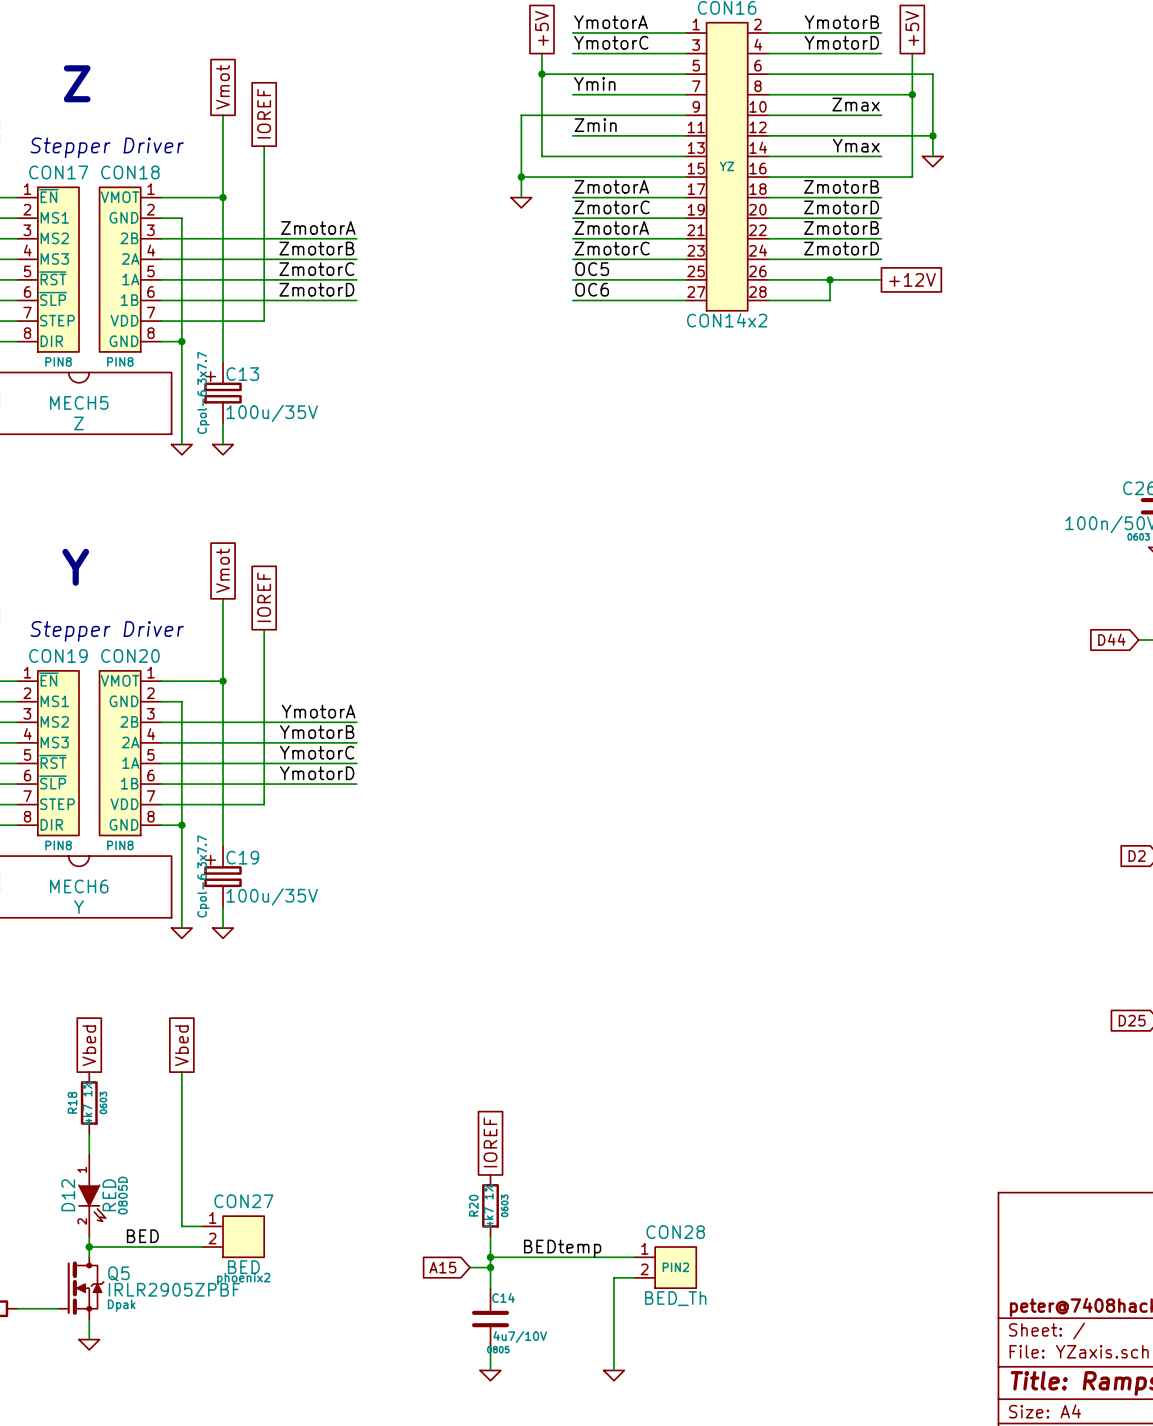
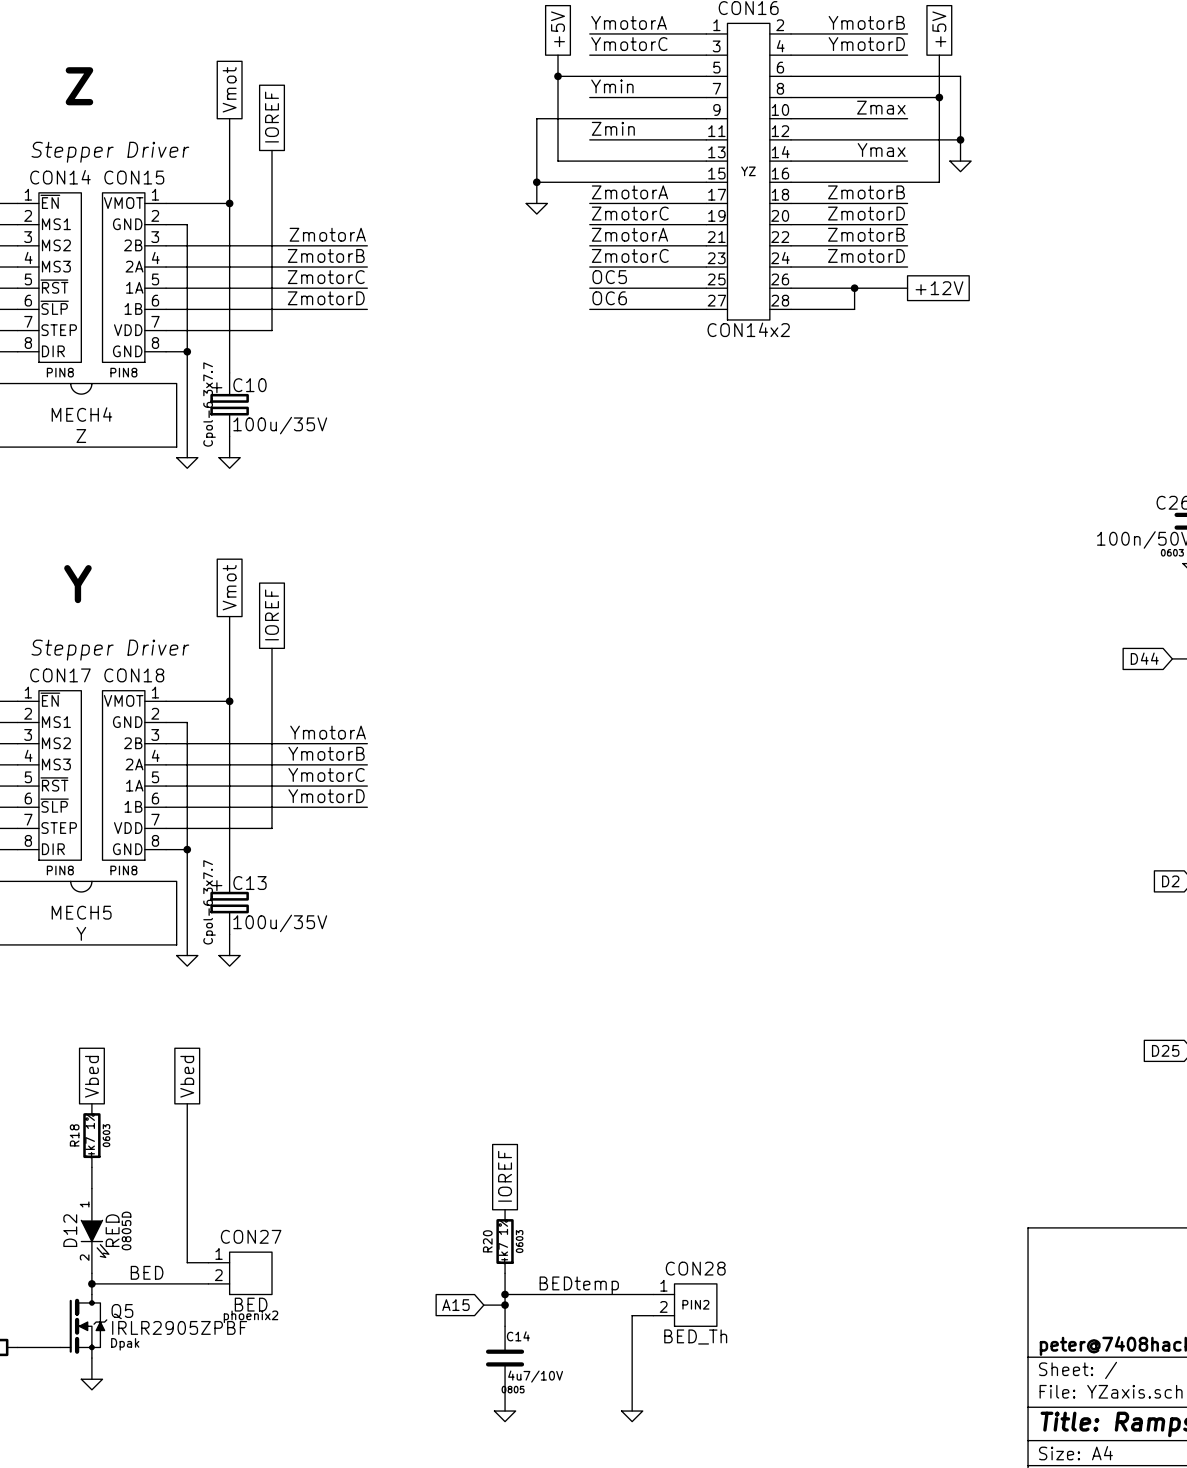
CON17 name: CON17 (58, 172) -> CON14 (60, 177)
CON18 name: CON18 (130, 172) -> CON15 (134, 177)
C13 name: C13 (242, 374) -> C10 (249, 385)
MECH5 name: MECH5 (79, 402) -> MECH4 (81, 414)
CON19 name: CON19 (58, 656) -> CON17 (60, 675)
CON20 name: CON20 (130, 656) -> CON18 (134, 675)
C19 name: C19 (242, 857) -> C13 (249, 883)
MECH6 name: MECH6 (79, 886) -> MECH5 (81, 912)

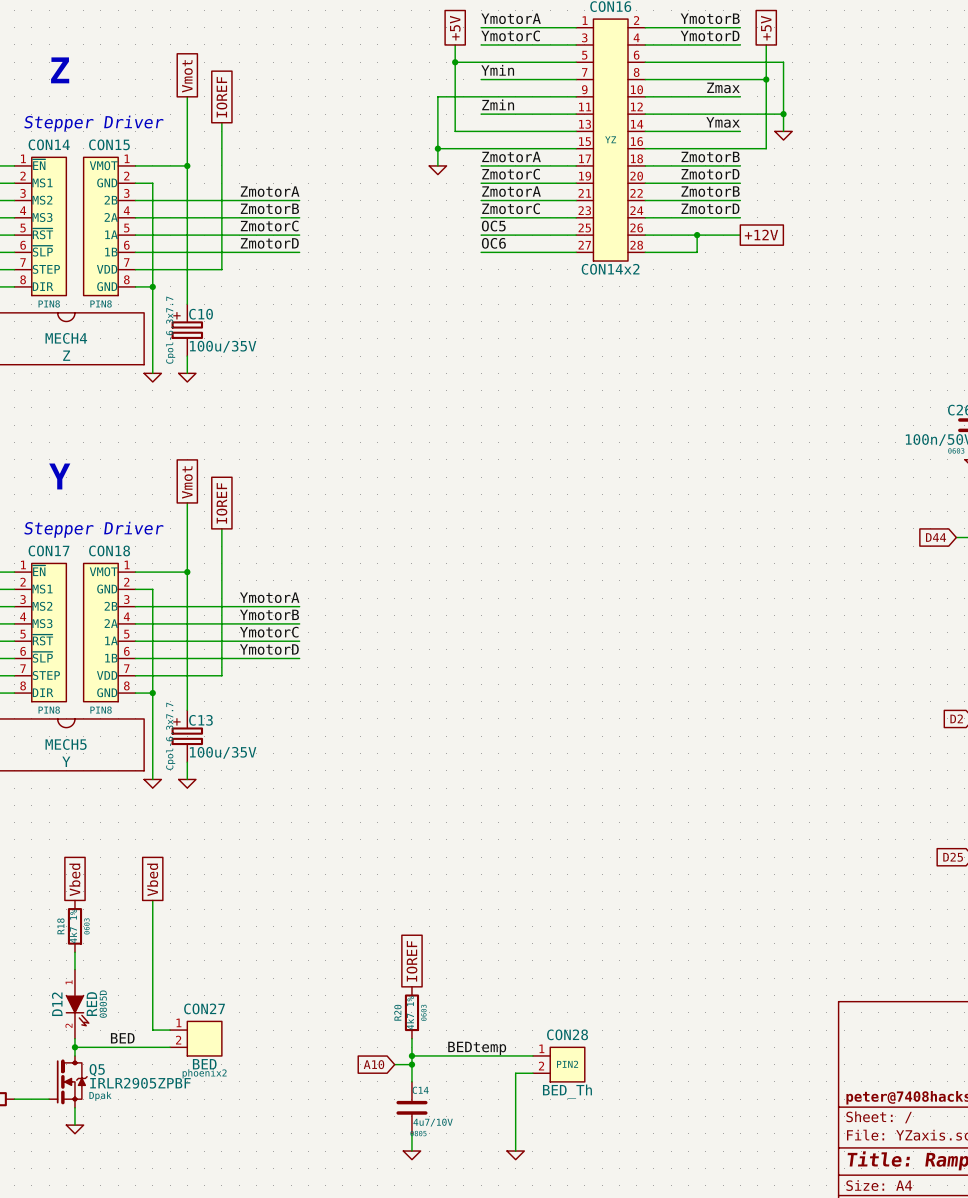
global label: A15 (455, 1305) -> A10 (373, 1064)

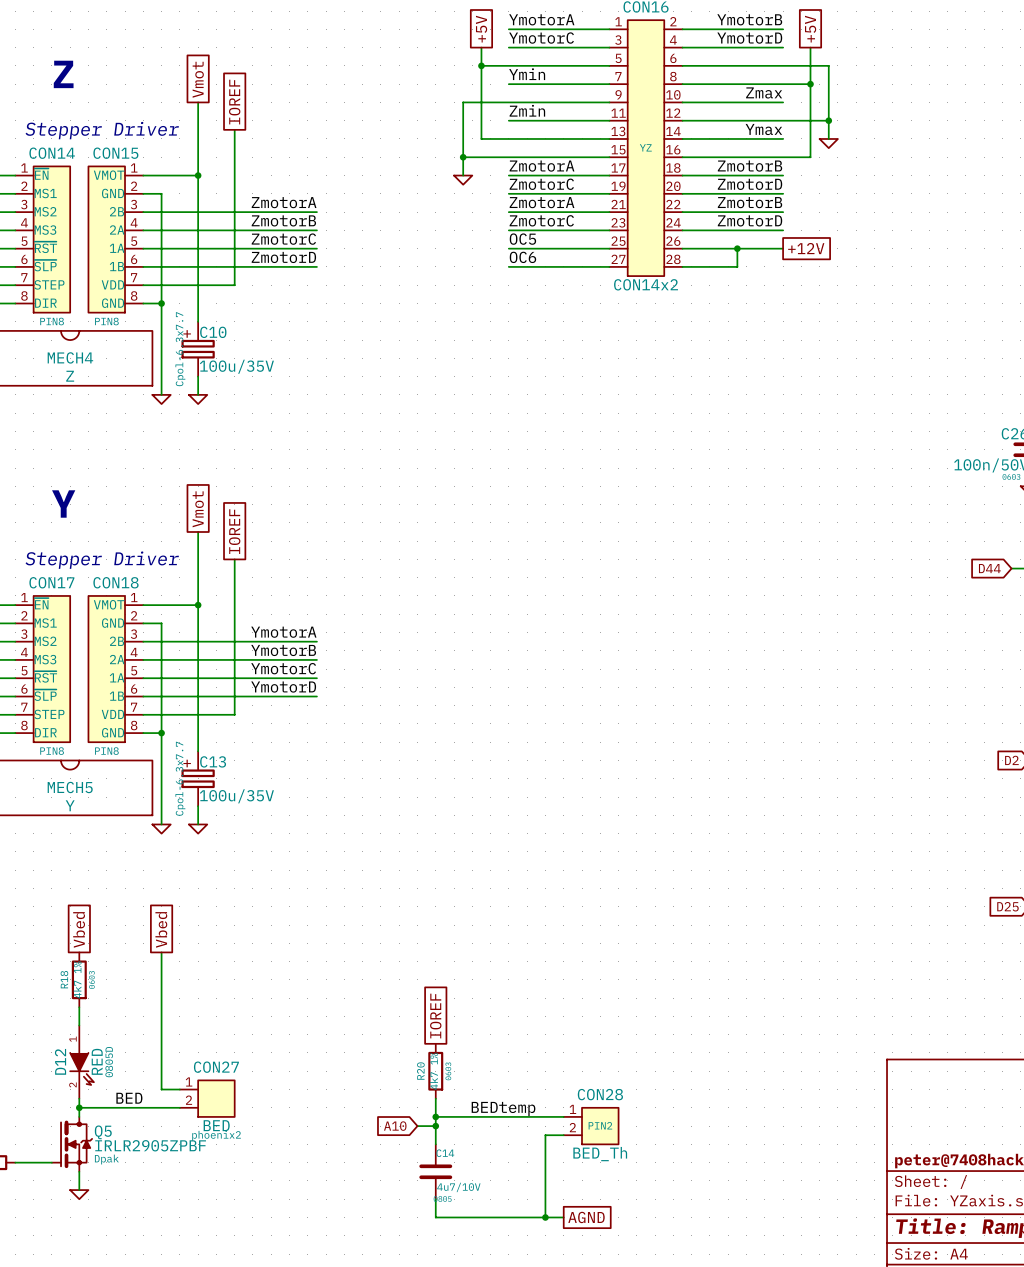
wire: none -> (435, 1217) (563, 1217)
junction: none -> (545, 1217)
global label: none -> AGND (586, 1217)
power symbol: (411, 1155) -> none
power symbol: (515, 1155) -> none

